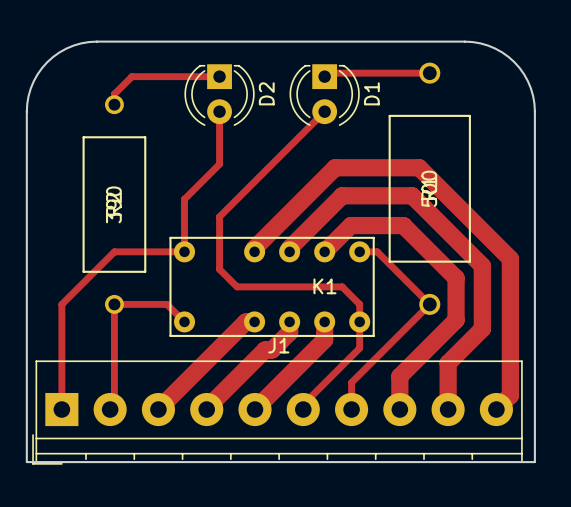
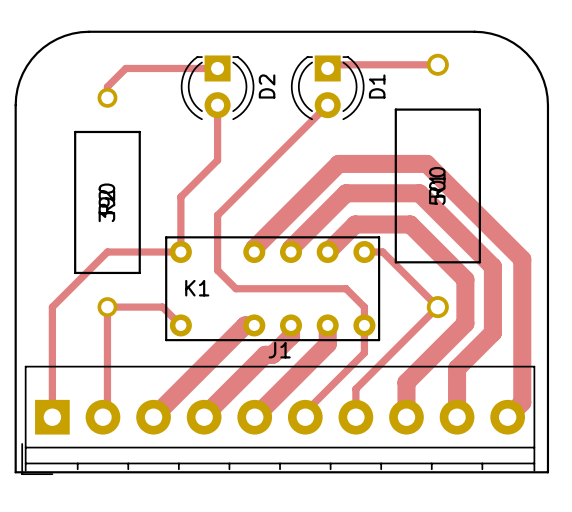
K1 name position: K1 (324, 286) -> K1 (197, 288)

